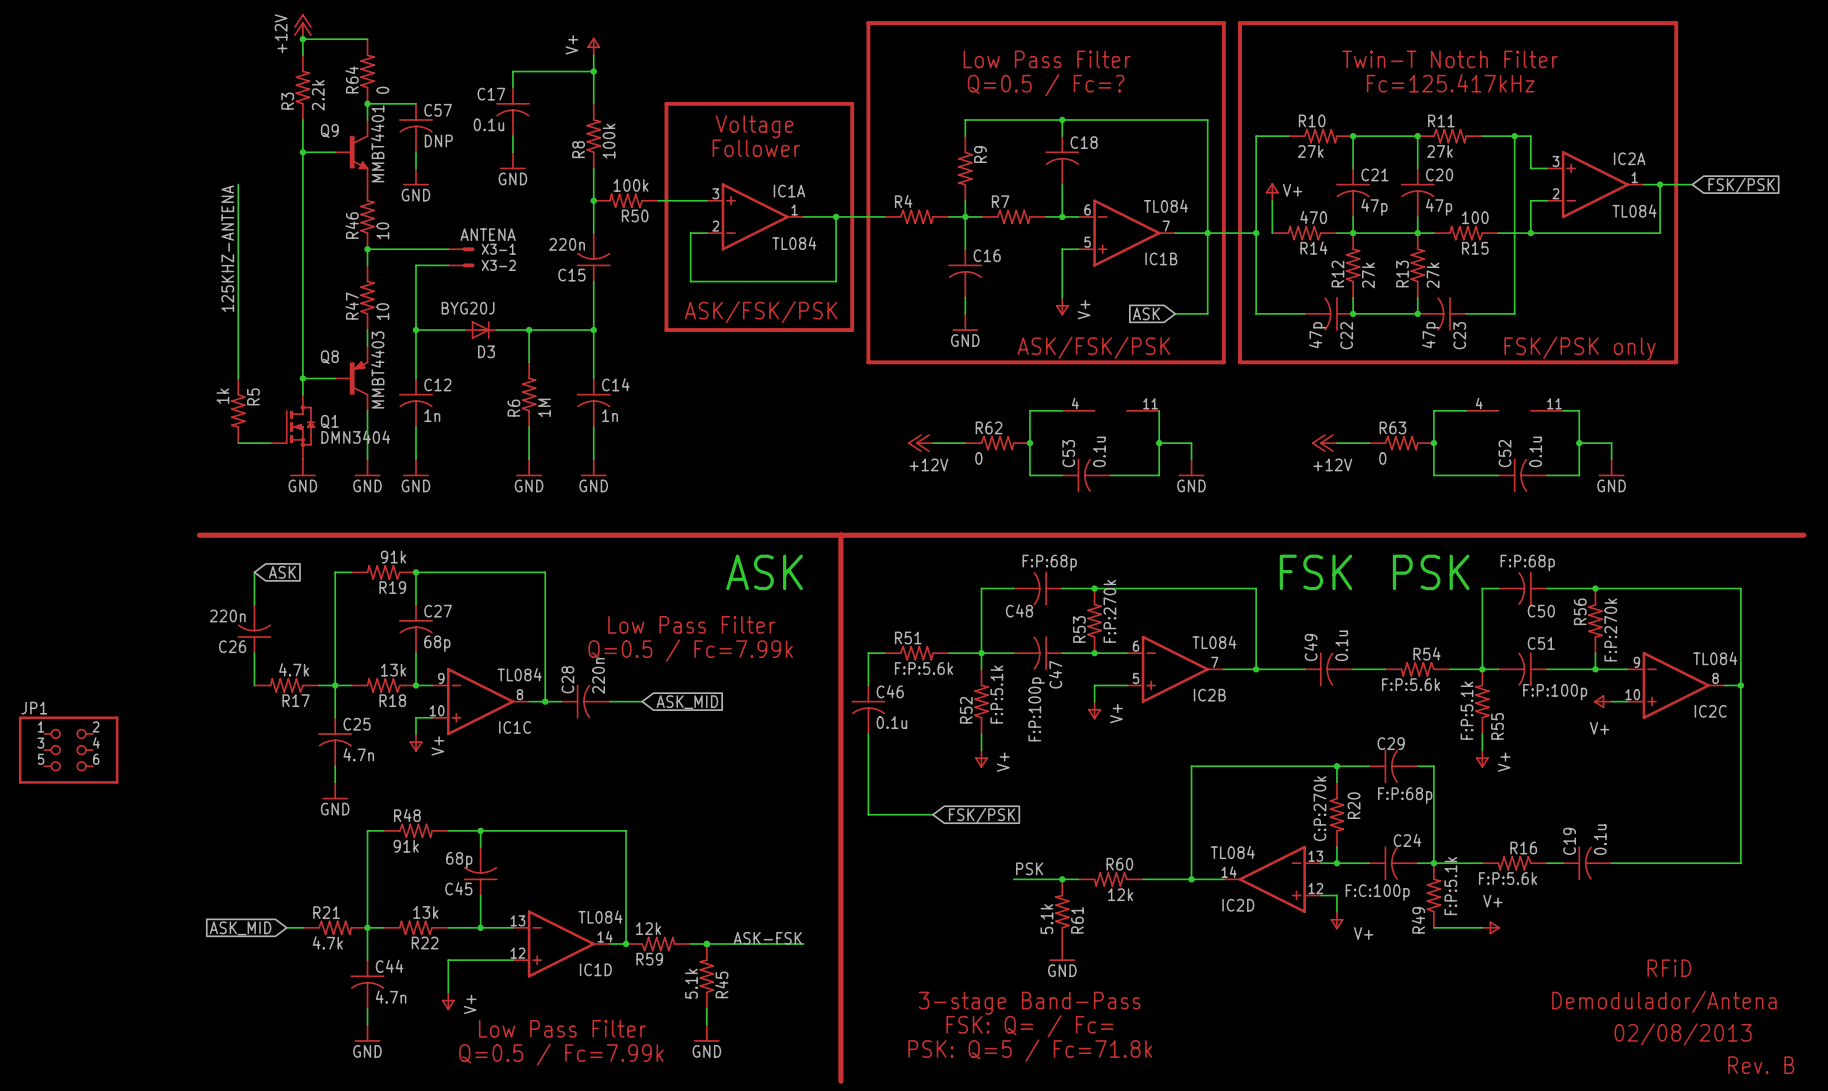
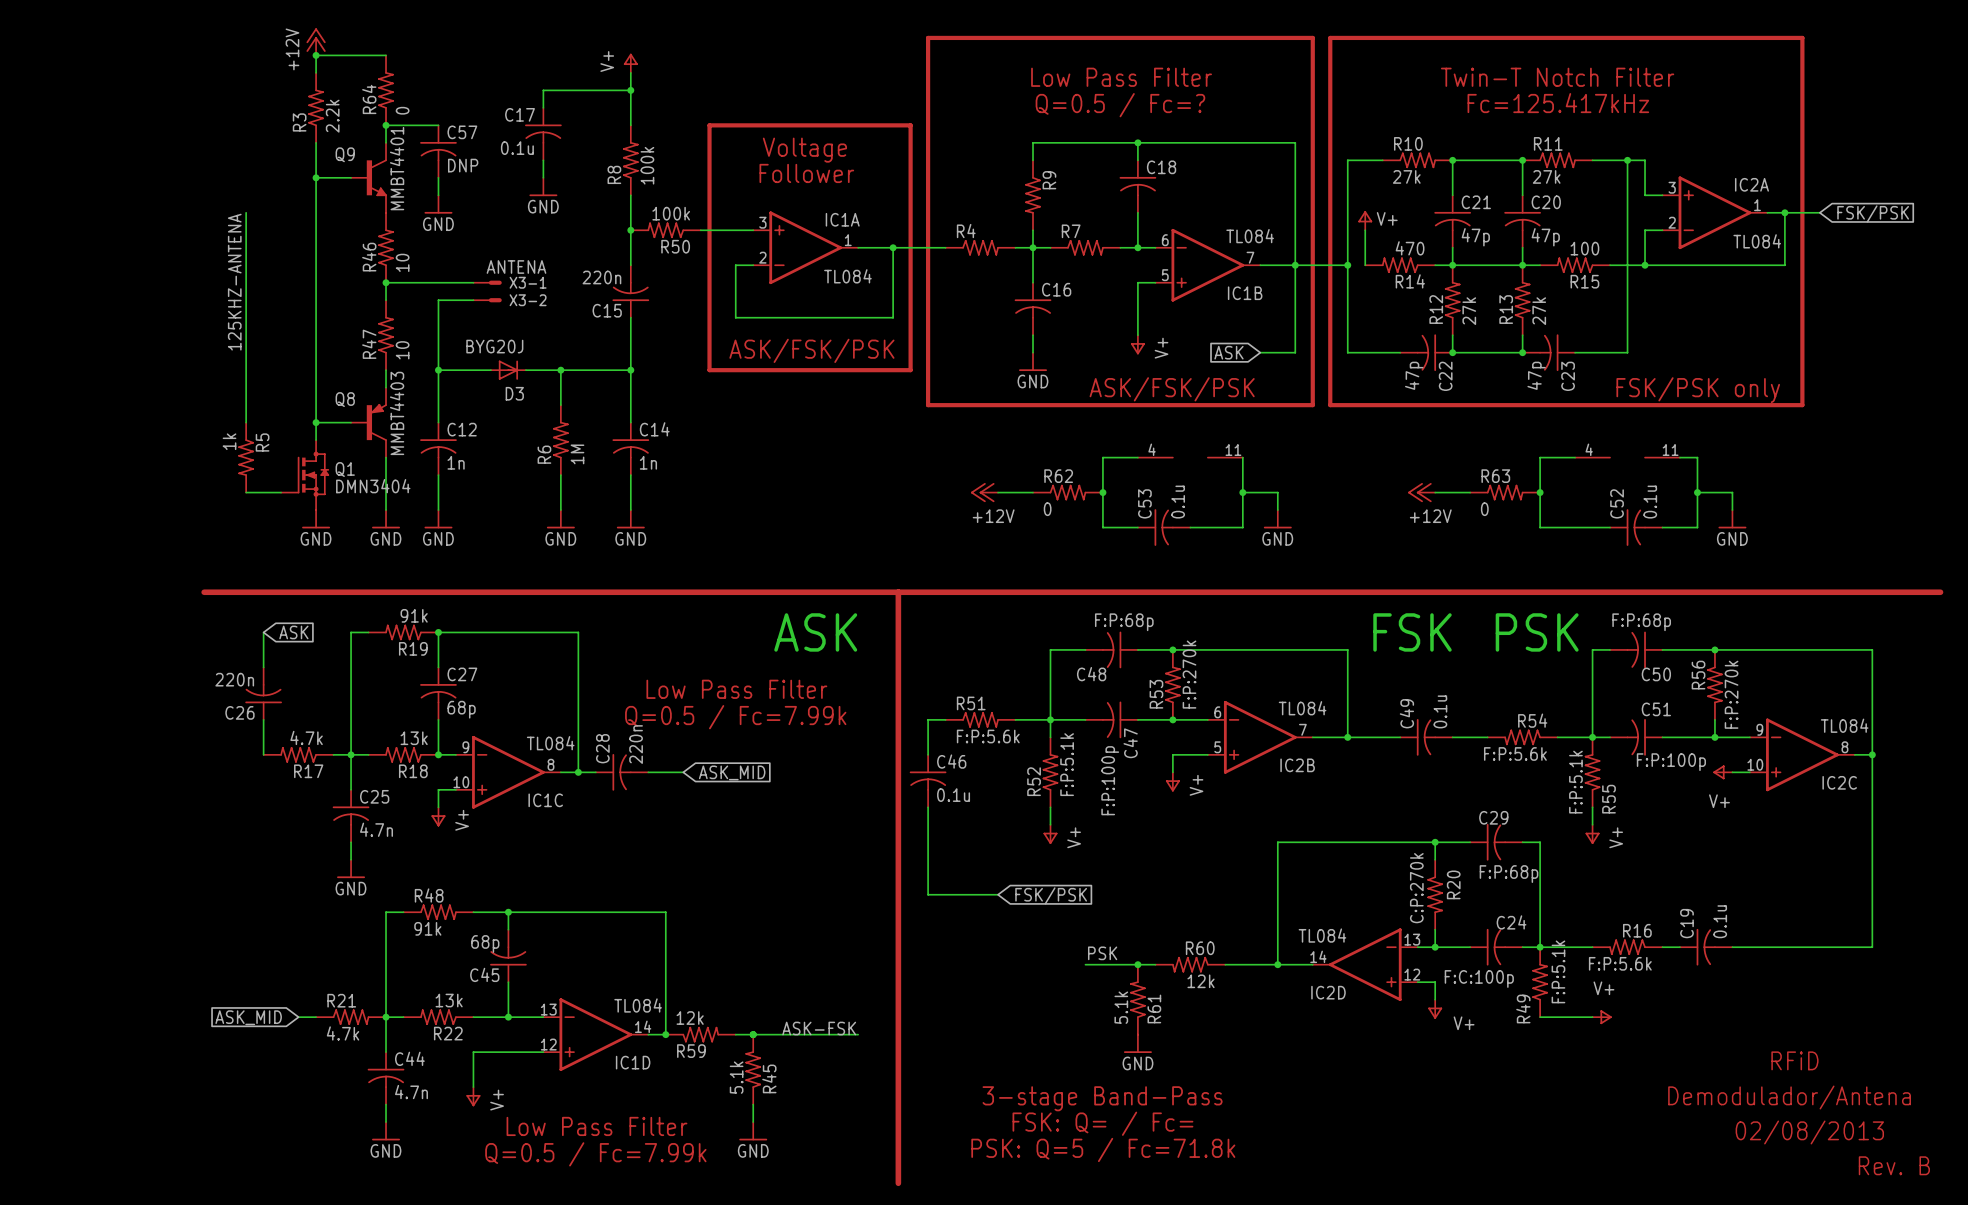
JP1: (68, 750) -> none

